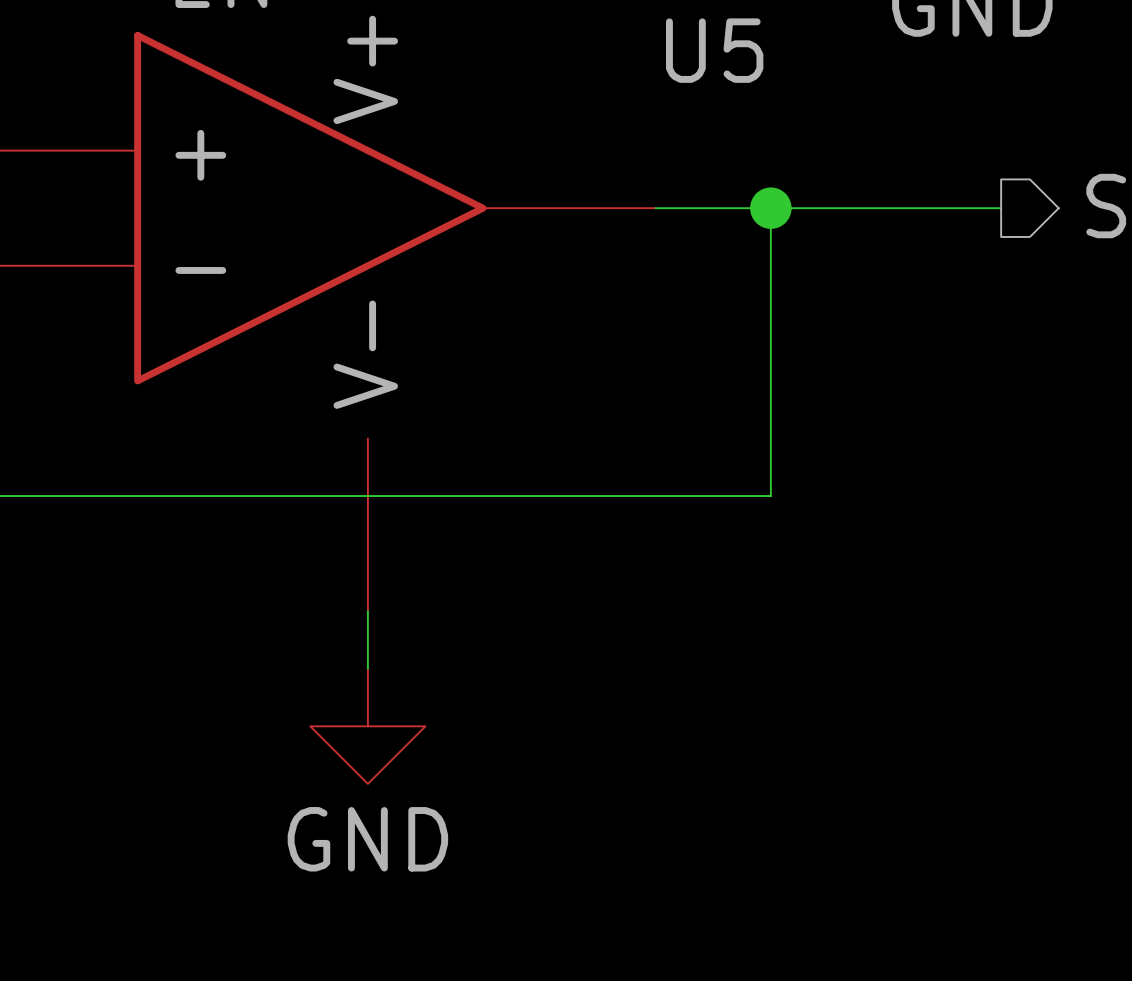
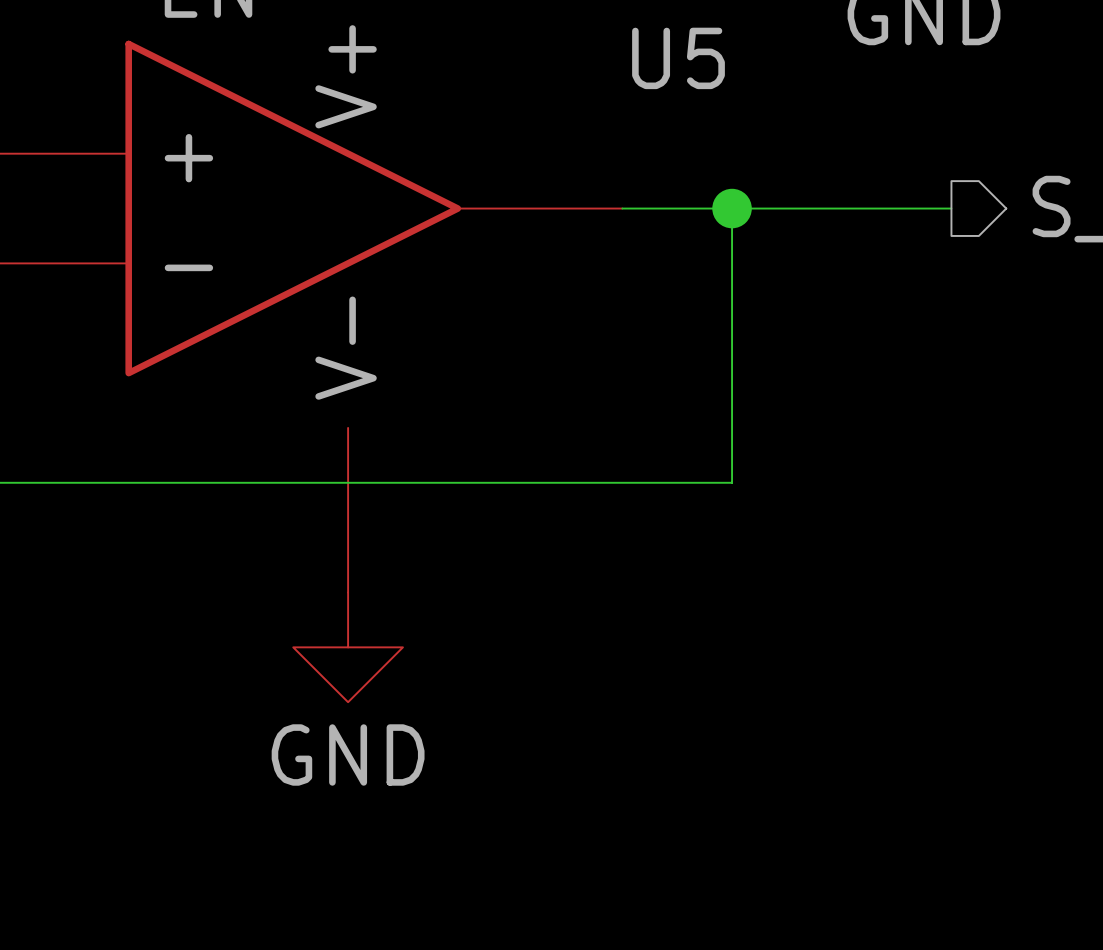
power symbol position: GND (367, 726) -> GND (348, 647)

